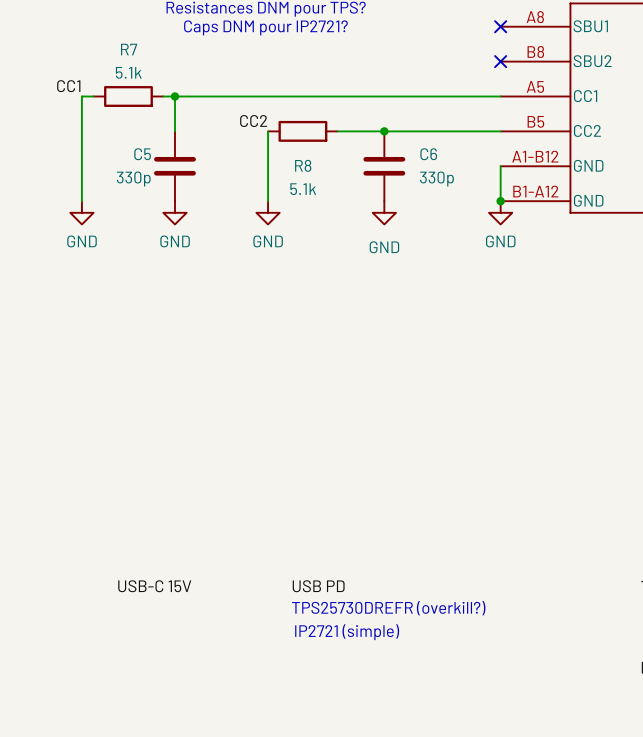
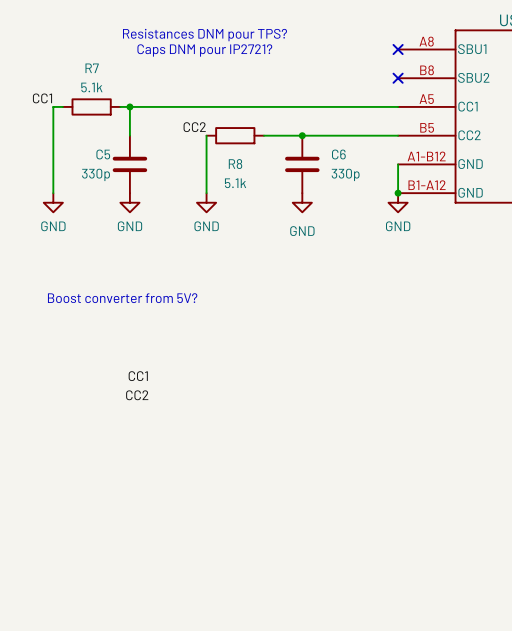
text: none -> Boost converter from 5V? (122, 298)
label: none -> CC1 (138, 376)
label: none -> CC2 (137, 395)
label: USB-C 15V (154, 586) -> none
label: USB PD (318, 586) -> none
text: TPS25730DREFR (overkill?) (388, 608) -> none
text: IP2721 (simple) (347, 632) -> none

